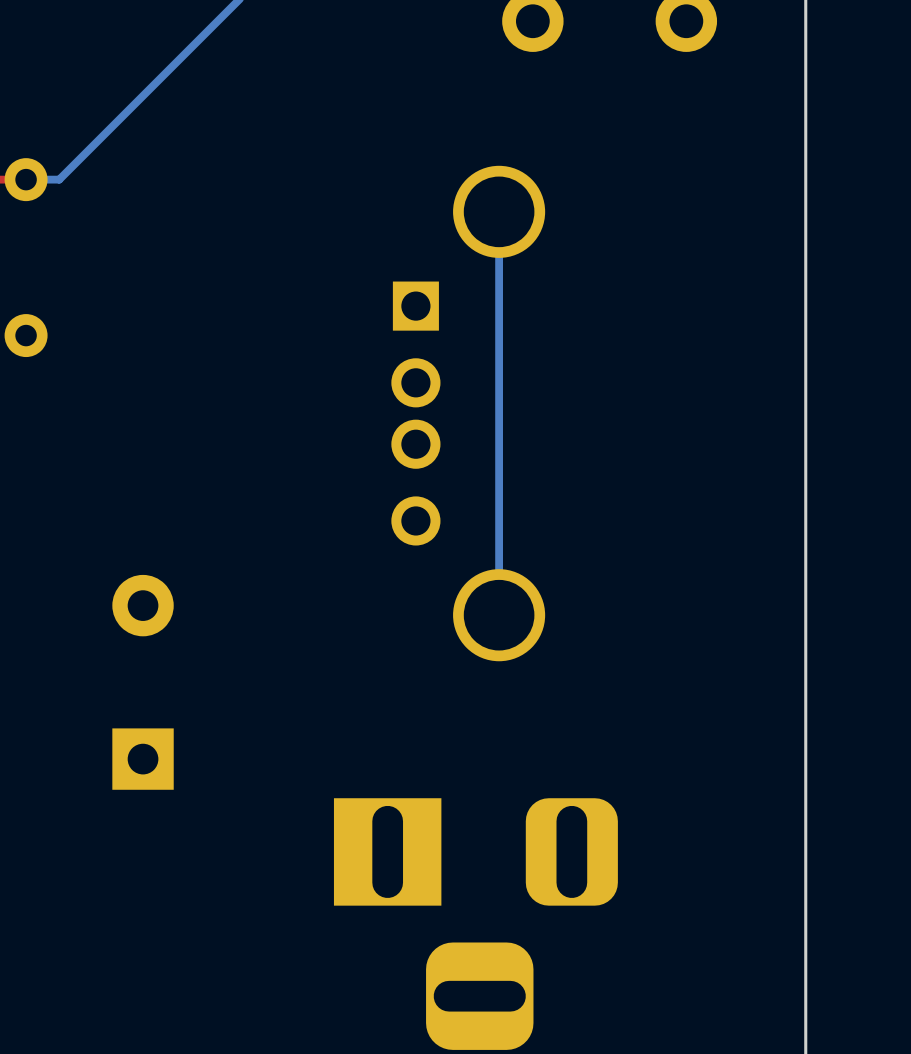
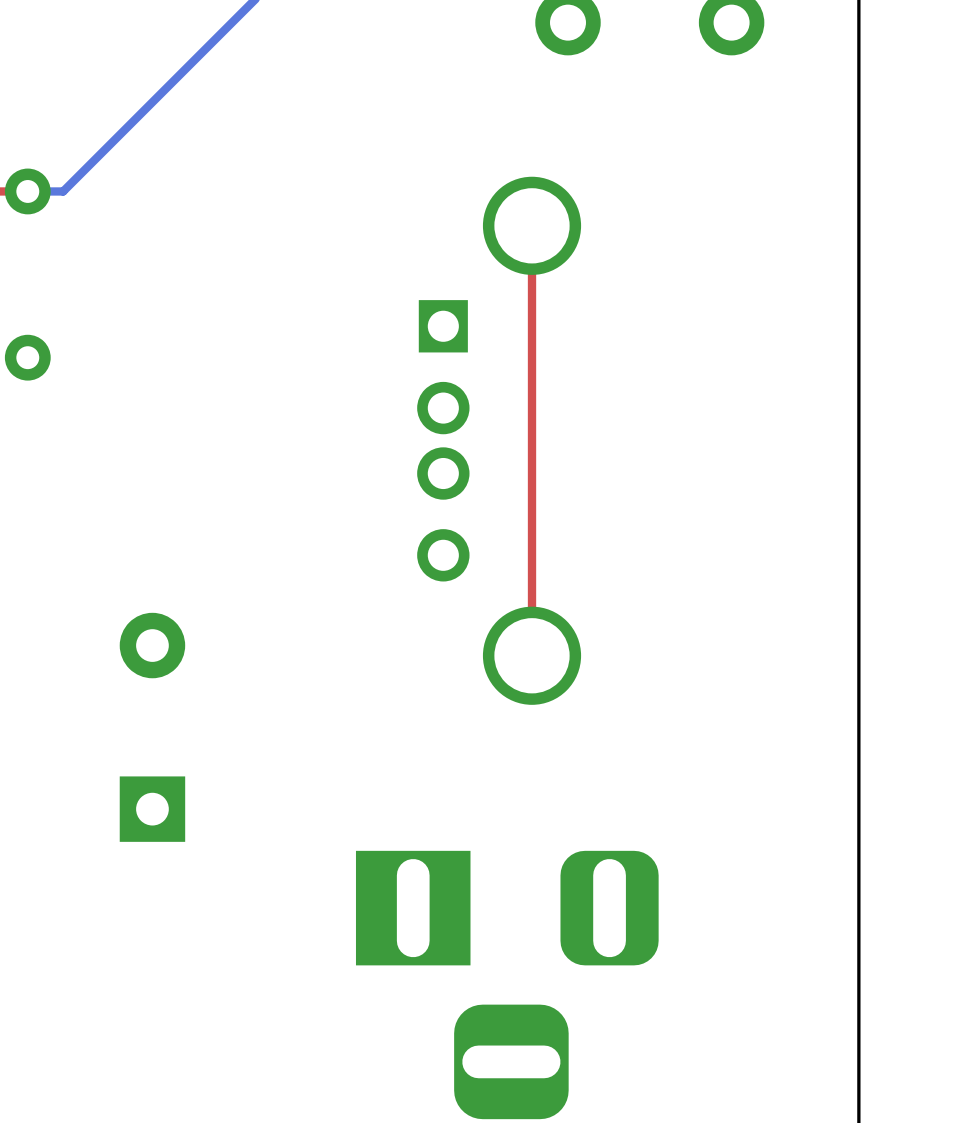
top track: none -> (532, 225) (532, 655)
bottom track: (499, 211) (499, 615) -> none

